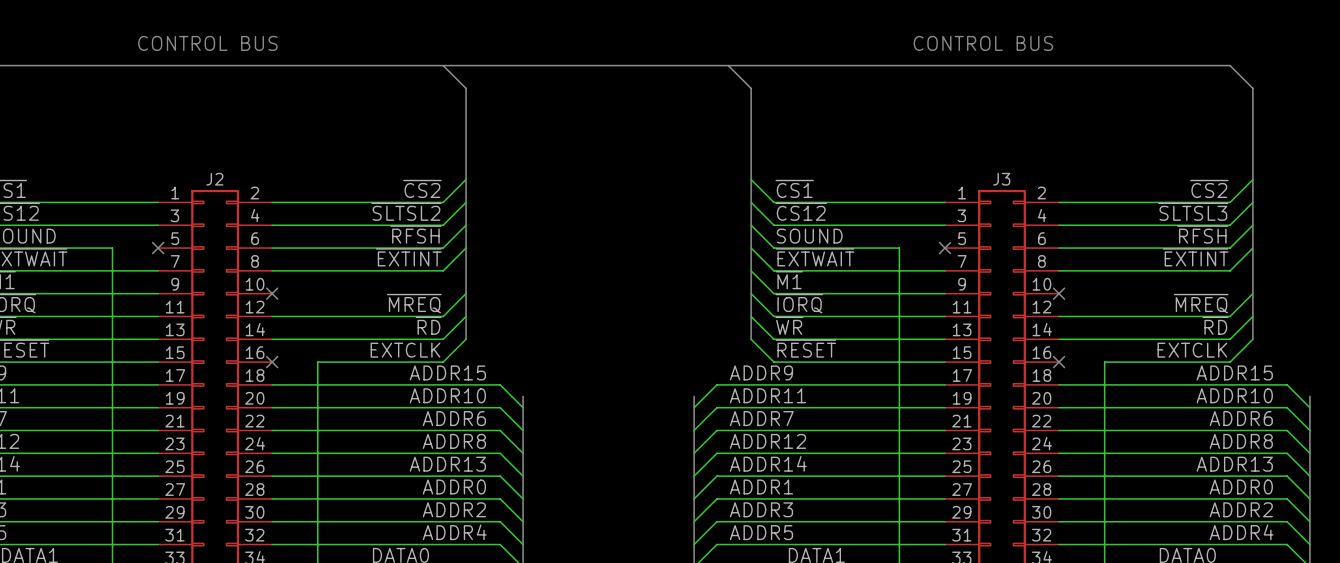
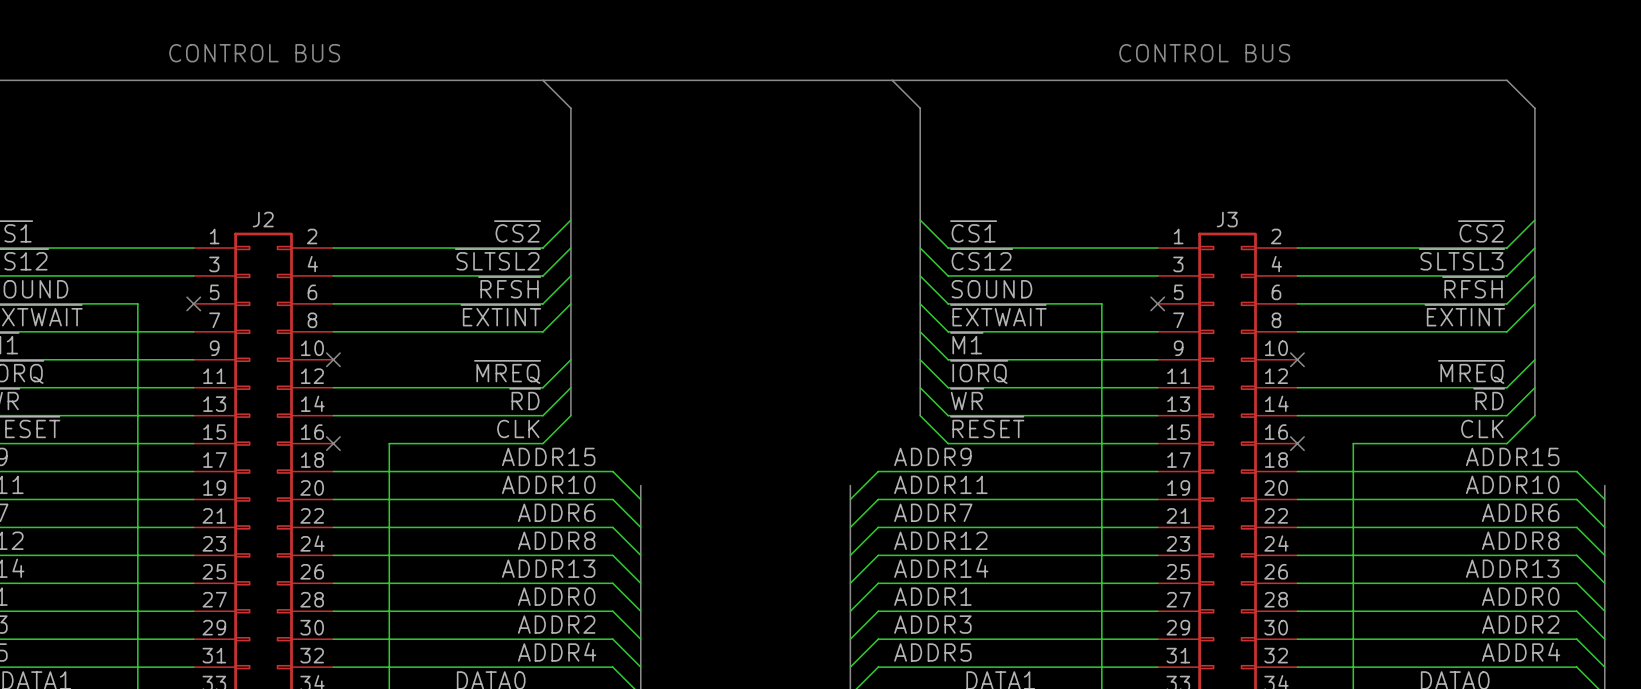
label: EXTCLK (405, 350) -> CLK (518, 428)
label: EXTCLK (1192, 350) -> CLK (1482, 428)

